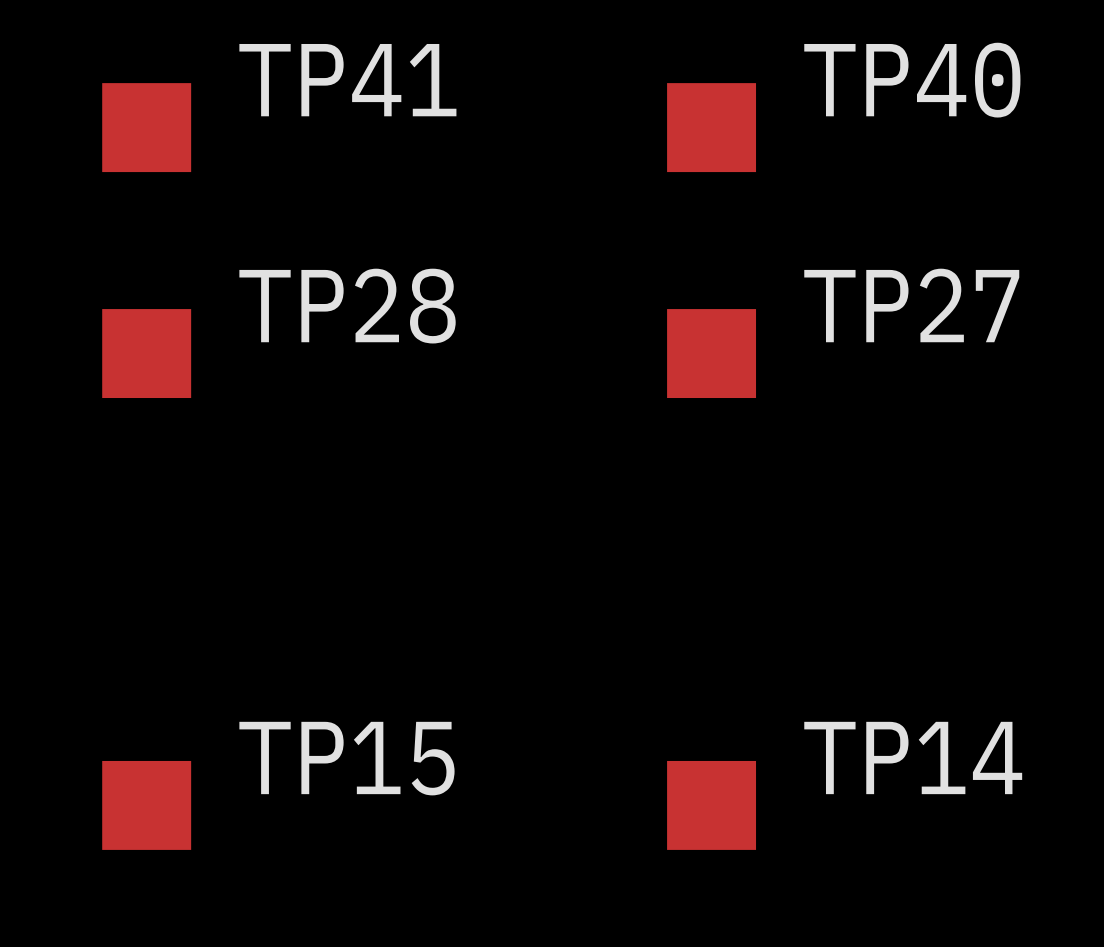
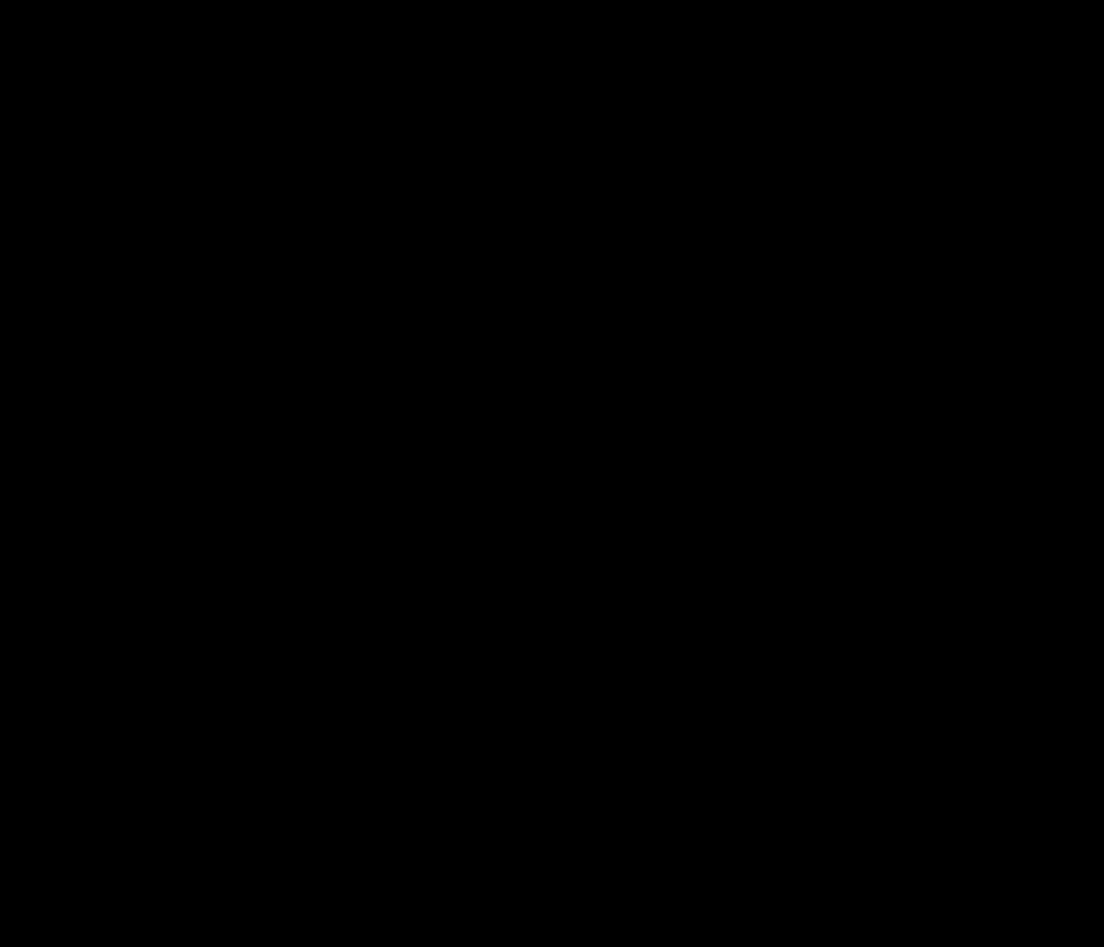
TP41: (146, 127) -> none
TP40: (711, 127) -> none
TP28: (146, 353) -> none
TP27: (711, 353) -> none
TP15: (146, 805) -> none
TP14: (711, 805) -> none

